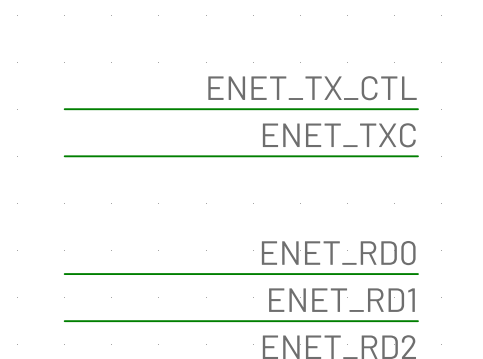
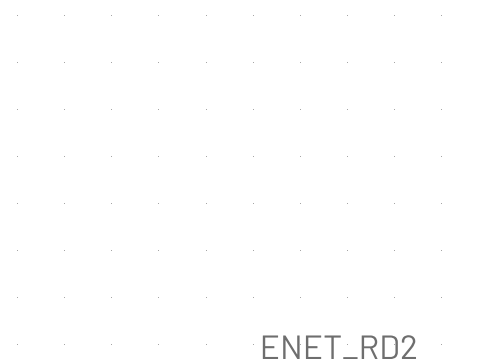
label: ENET_TX_CTL (312, 88) -> none
wire: (64, 109) (417, 109) -> none
label: ENET_TXC (339, 135) -> none
wire: (64, 156) (417, 156) -> none
label: ENET_RD0 (338, 253) -> none
wire: (64, 274) (417, 274) -> none
label: ENET_RD1 (341, 300) -> none
wire: (64, 321) (417, 321) -> none

